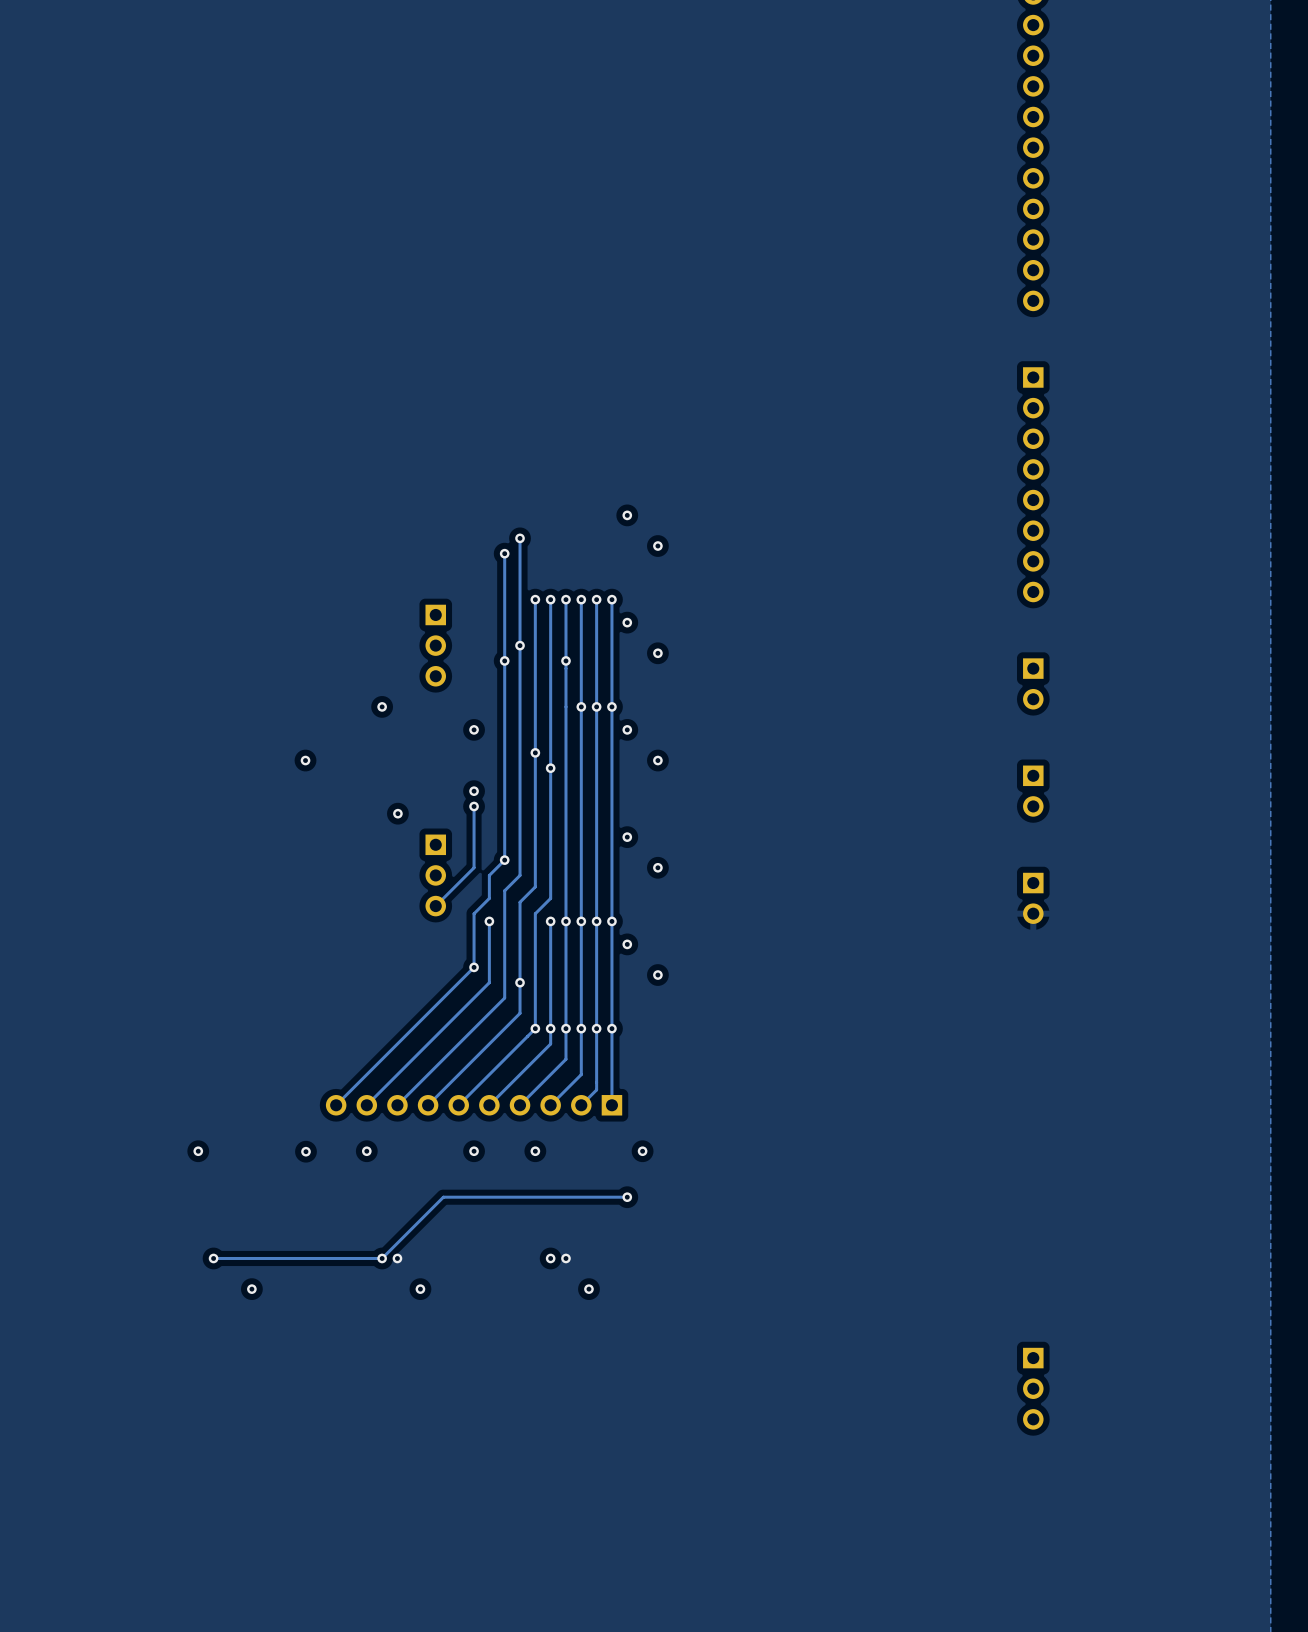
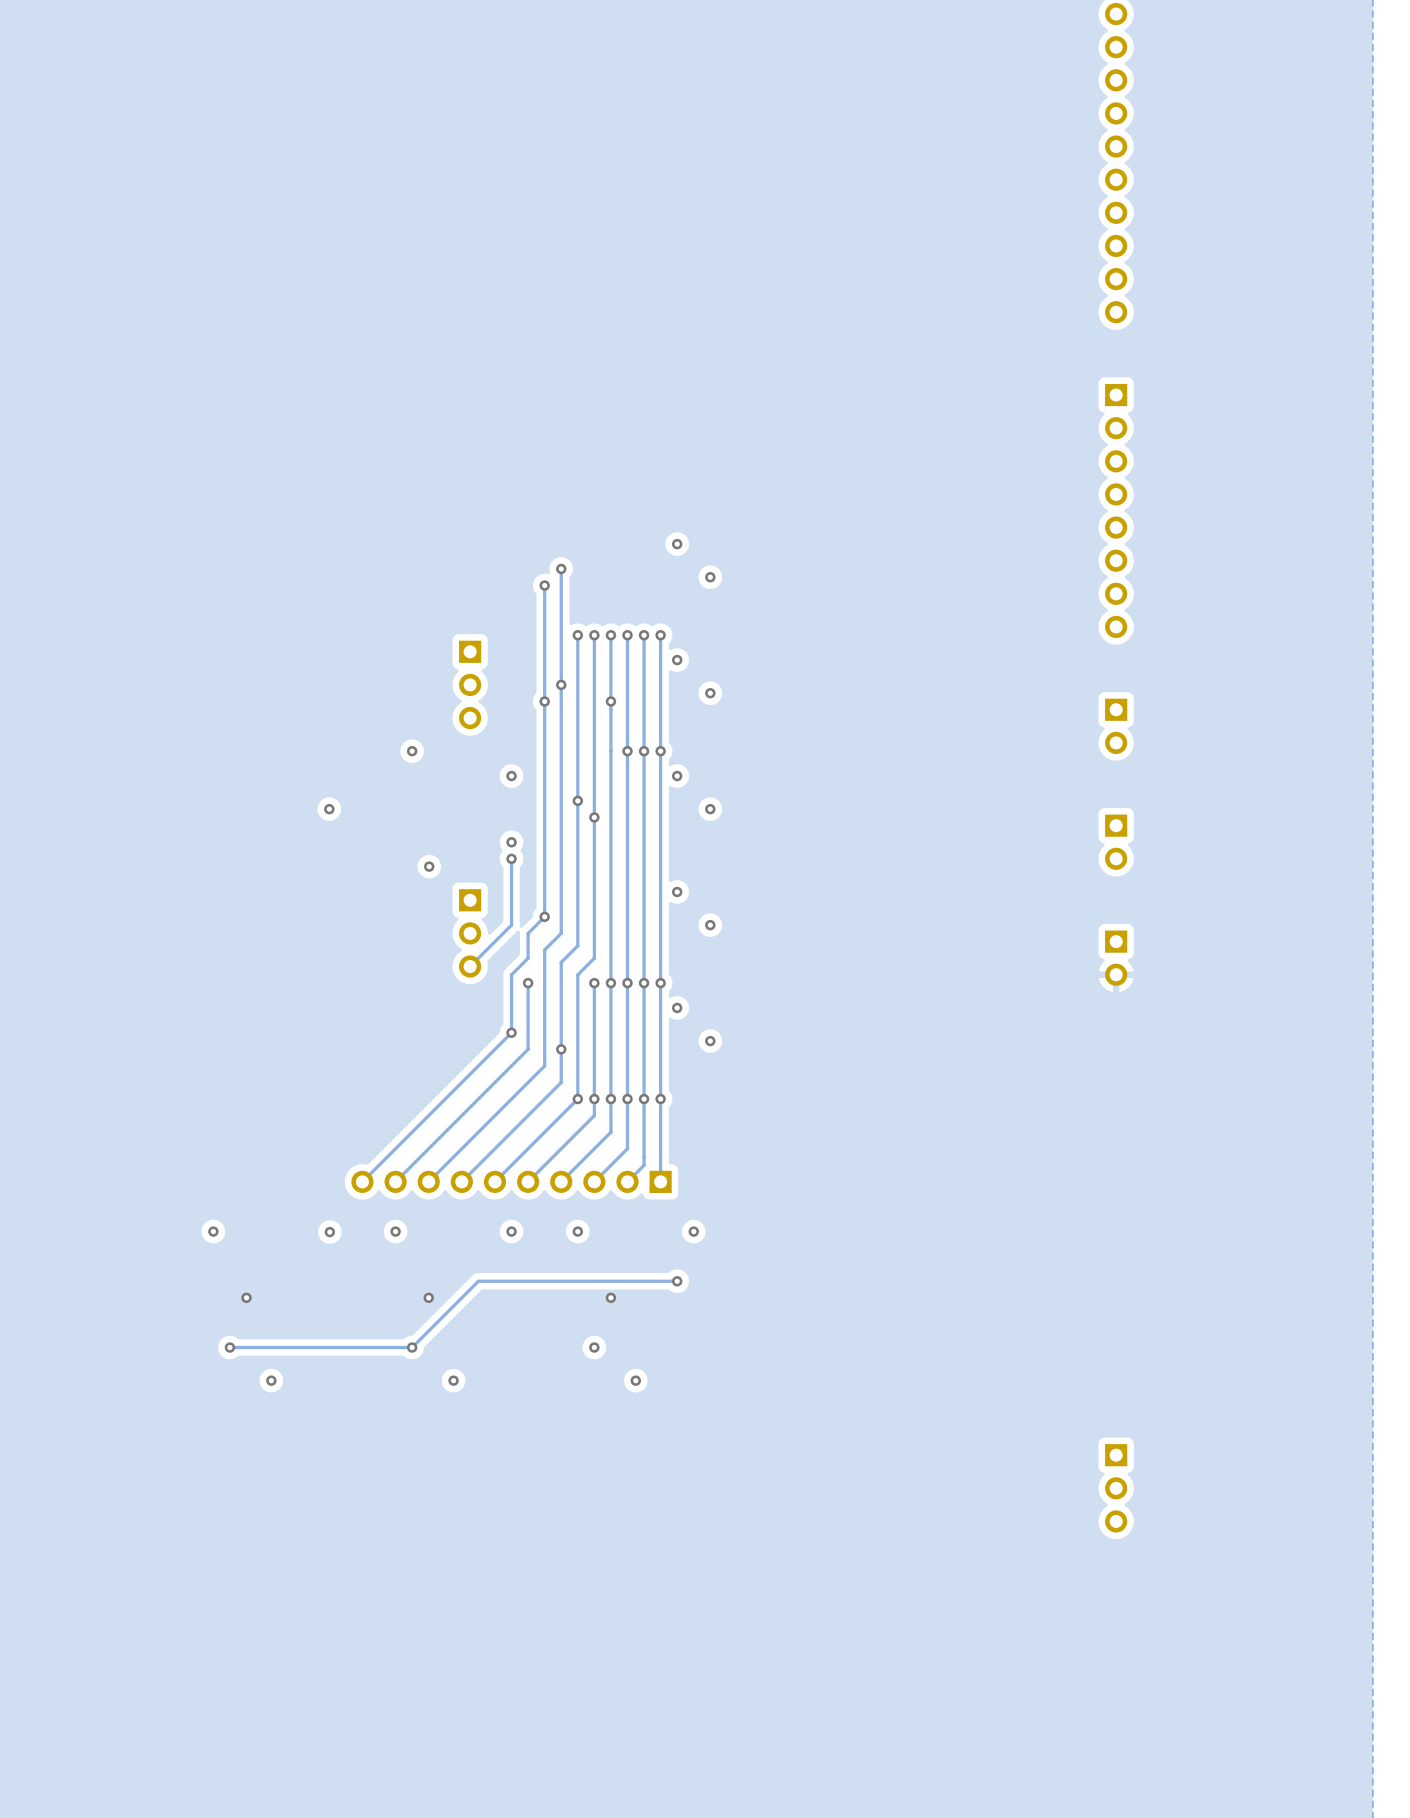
via: none -> (246, 1297)
via position: (397, 1258) -> (428, 1297)
via position: (565, 1258) -> (610, 1297)

